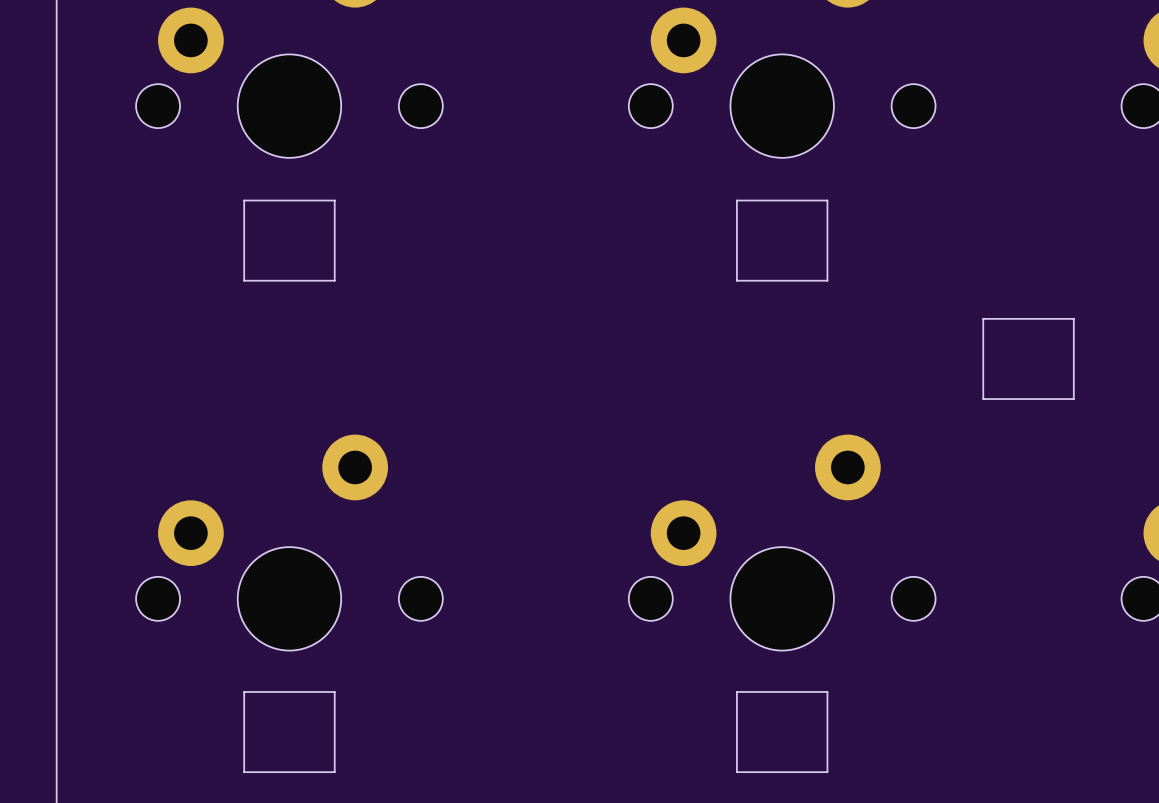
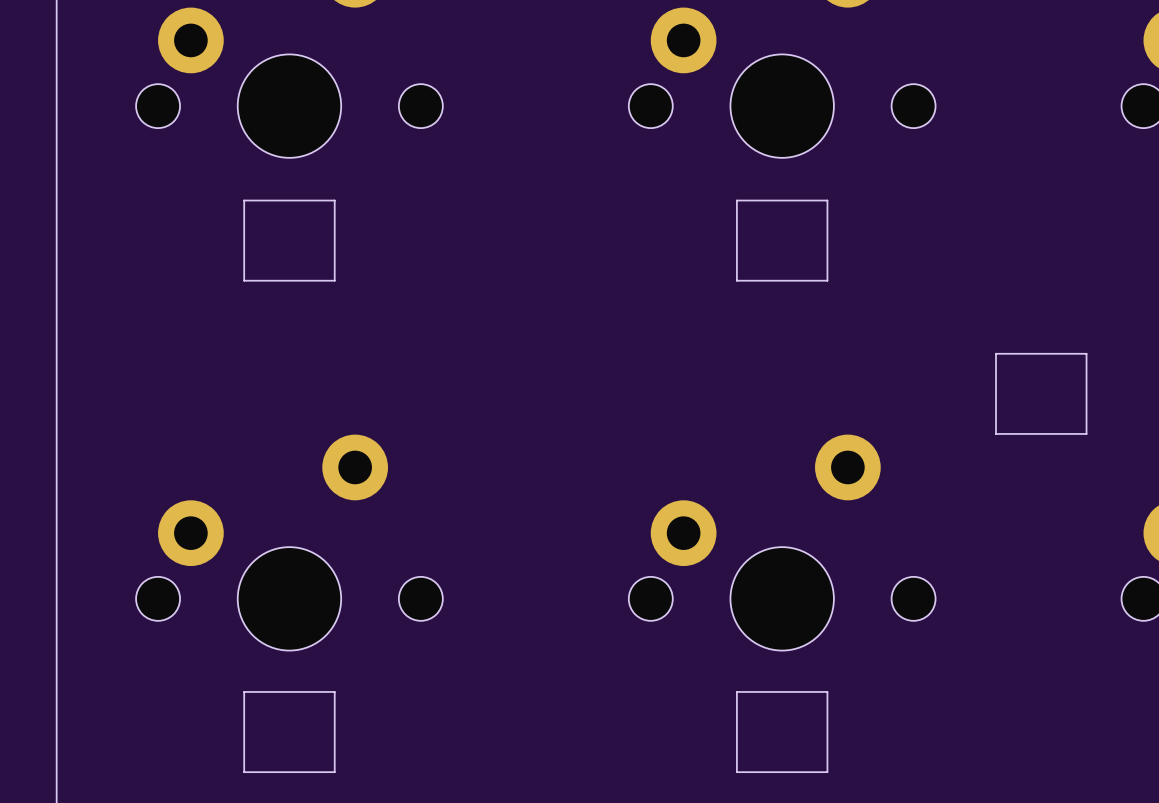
part position: (1028, 358) -> (1041, 393)

